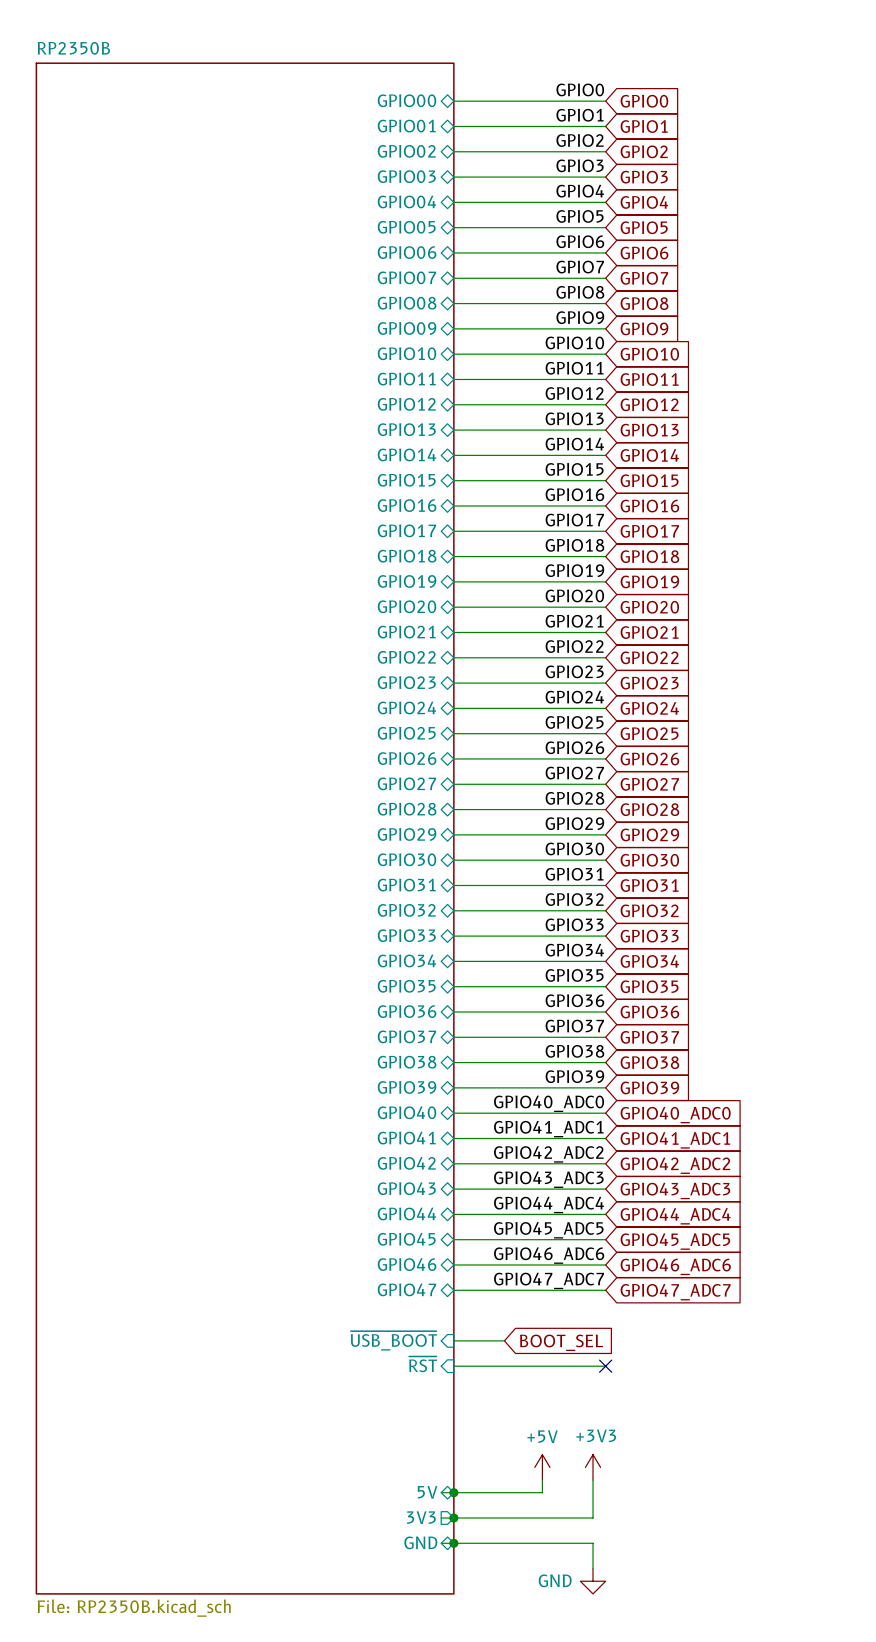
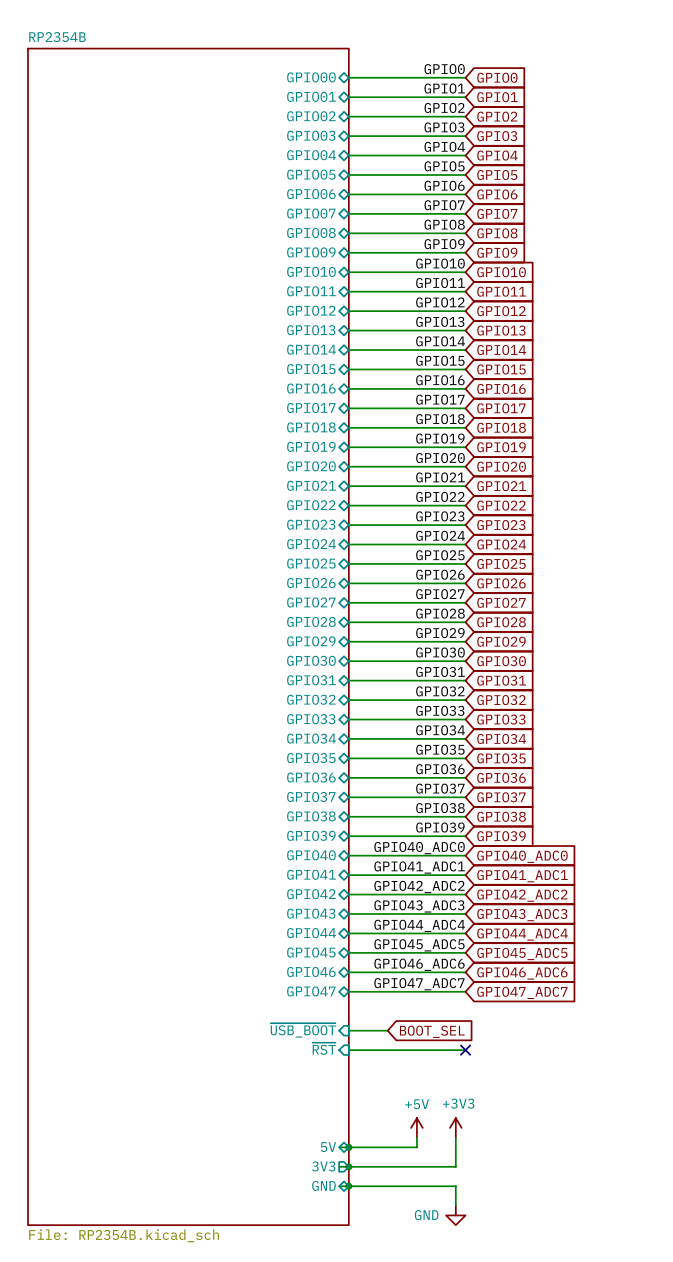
sheet RP2350B name: RP2350B (73, 48) -> RP2354B (57, 37)
sheet RP2350B value: File: RP2350B.kicad_sch (134, 1608) -> File: RP2354B.kicad_sch (124, 1235)

